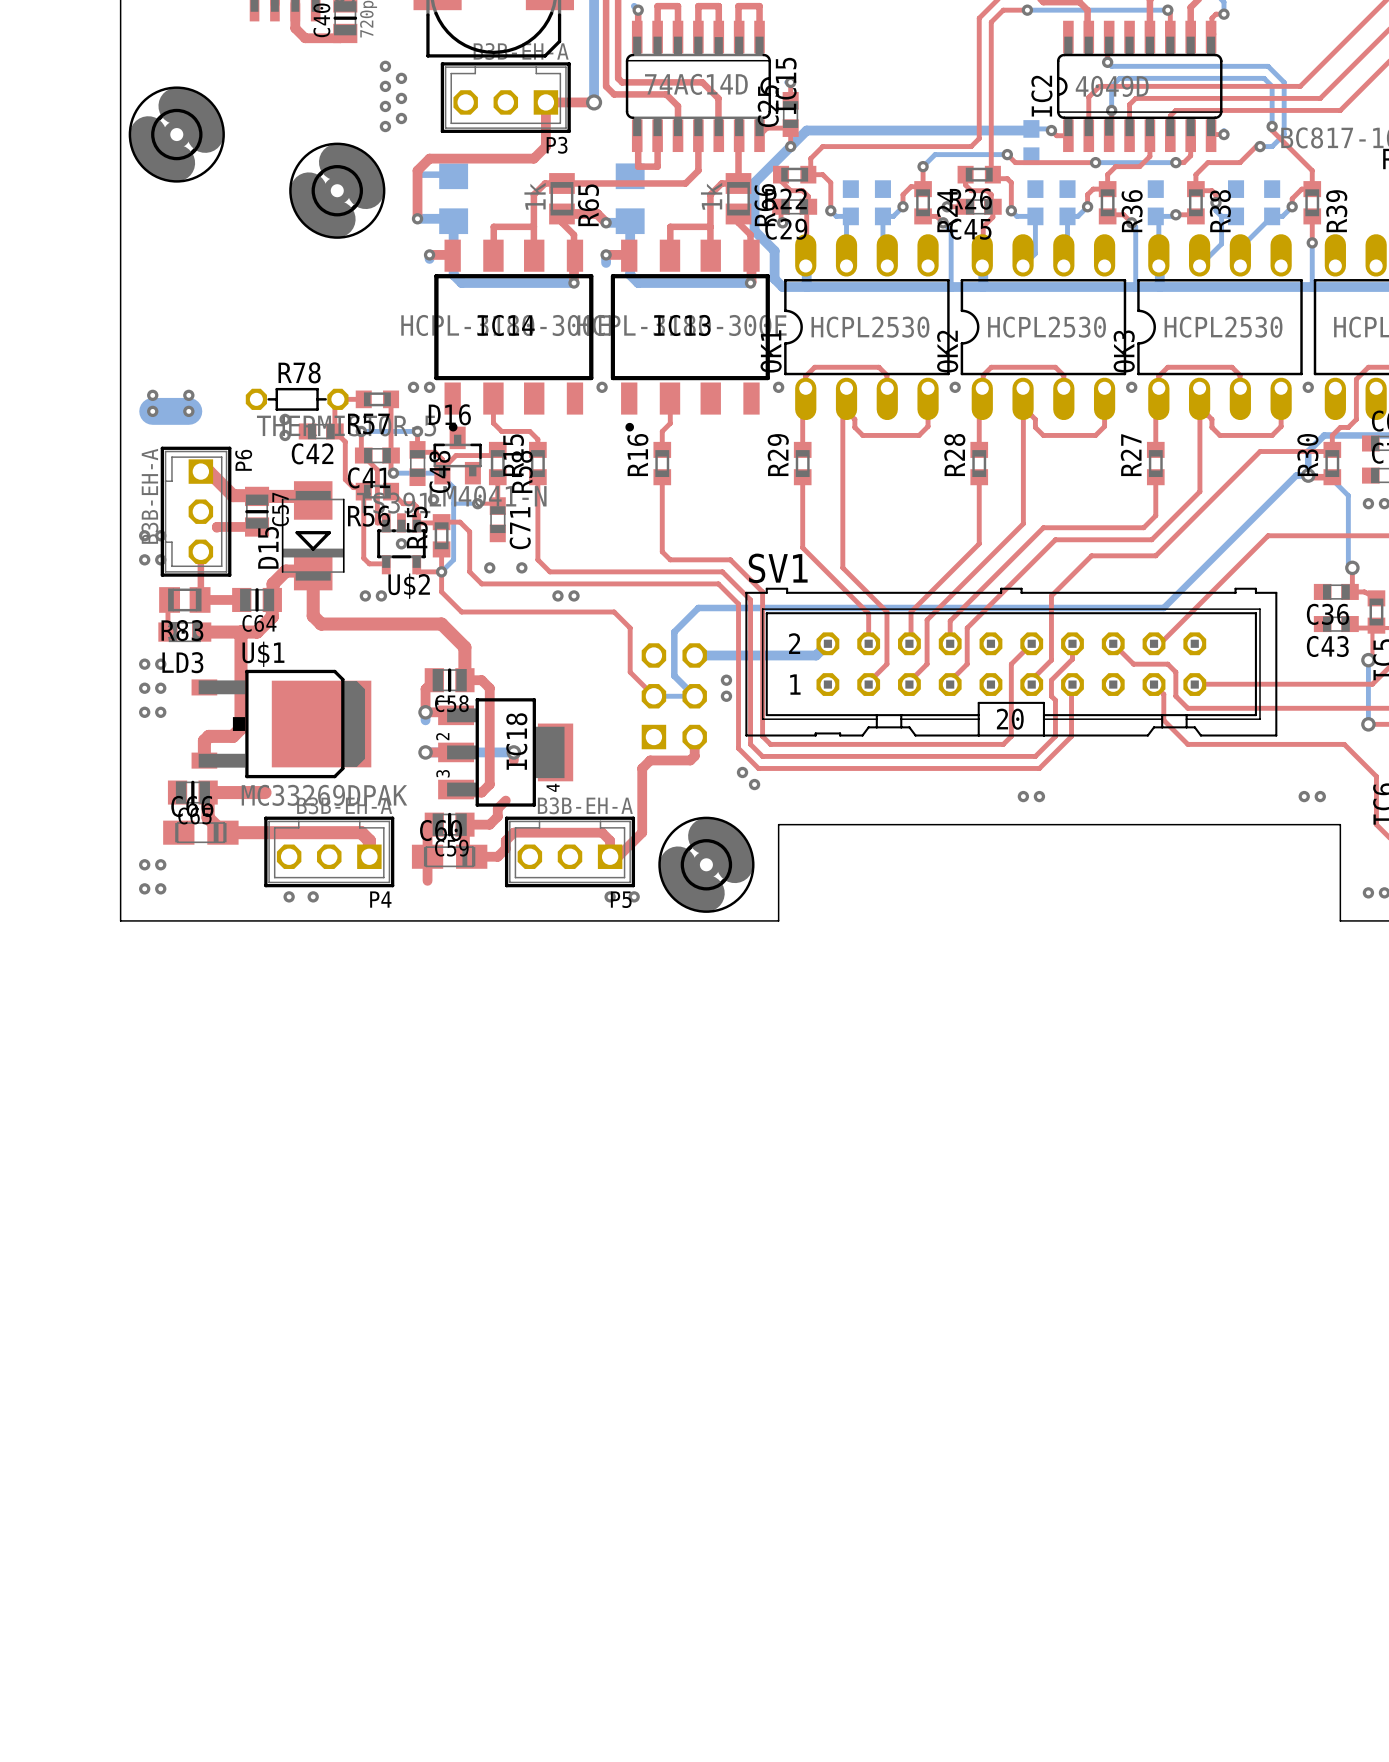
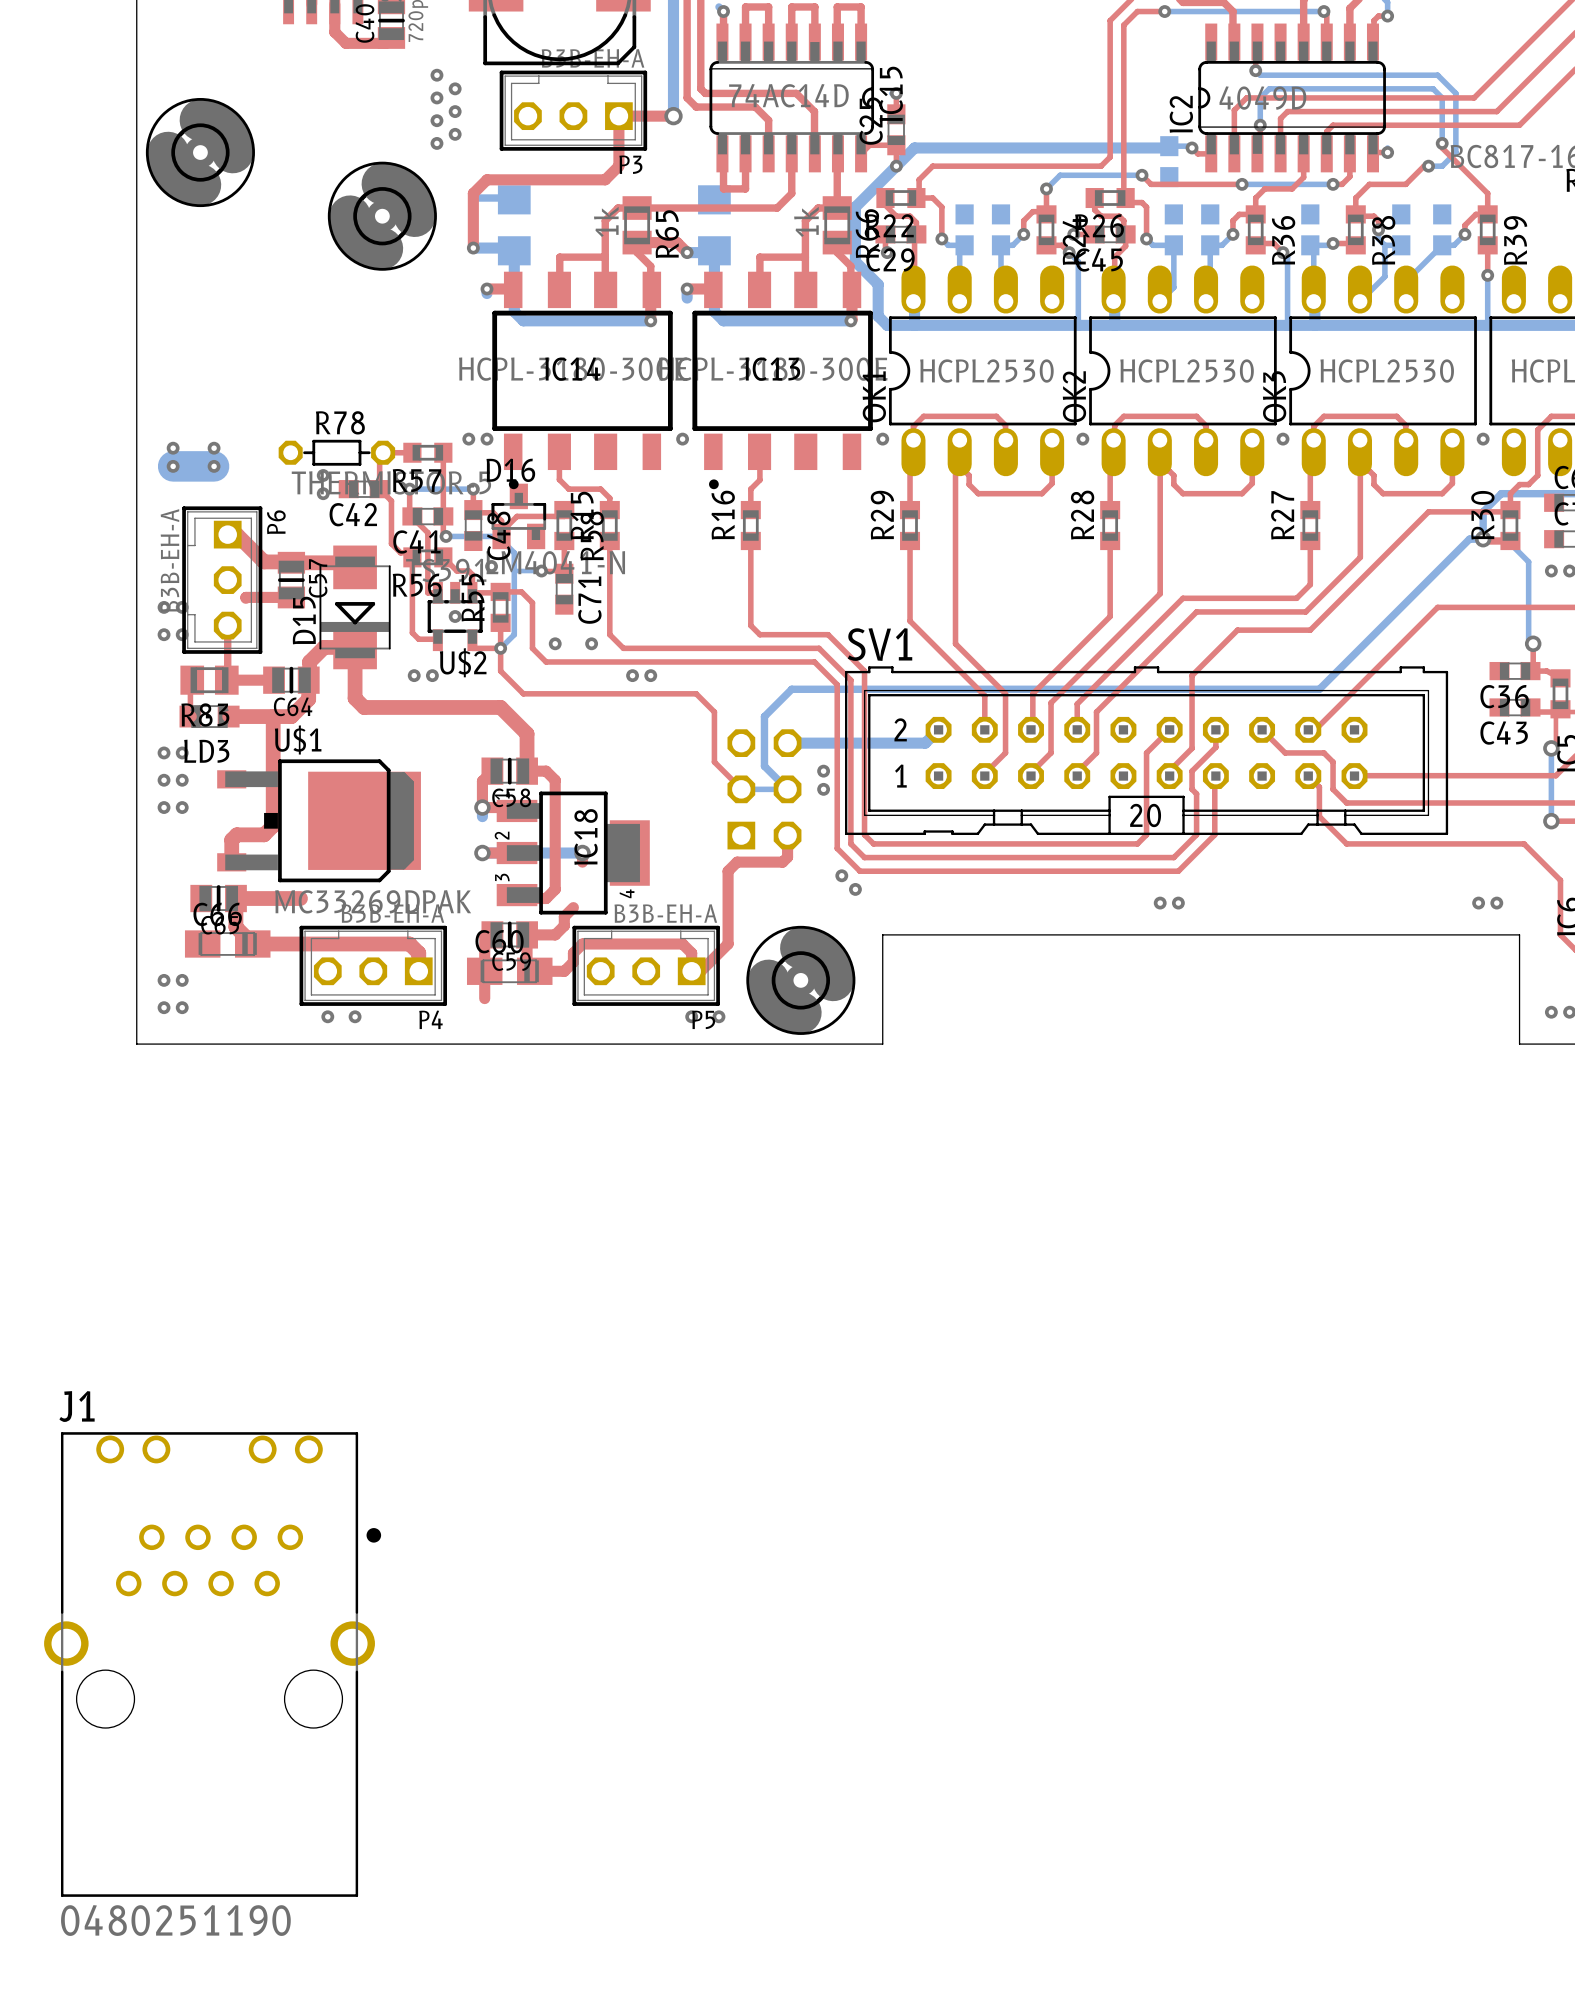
J1: none -> 0480251190 (212, 1664)

